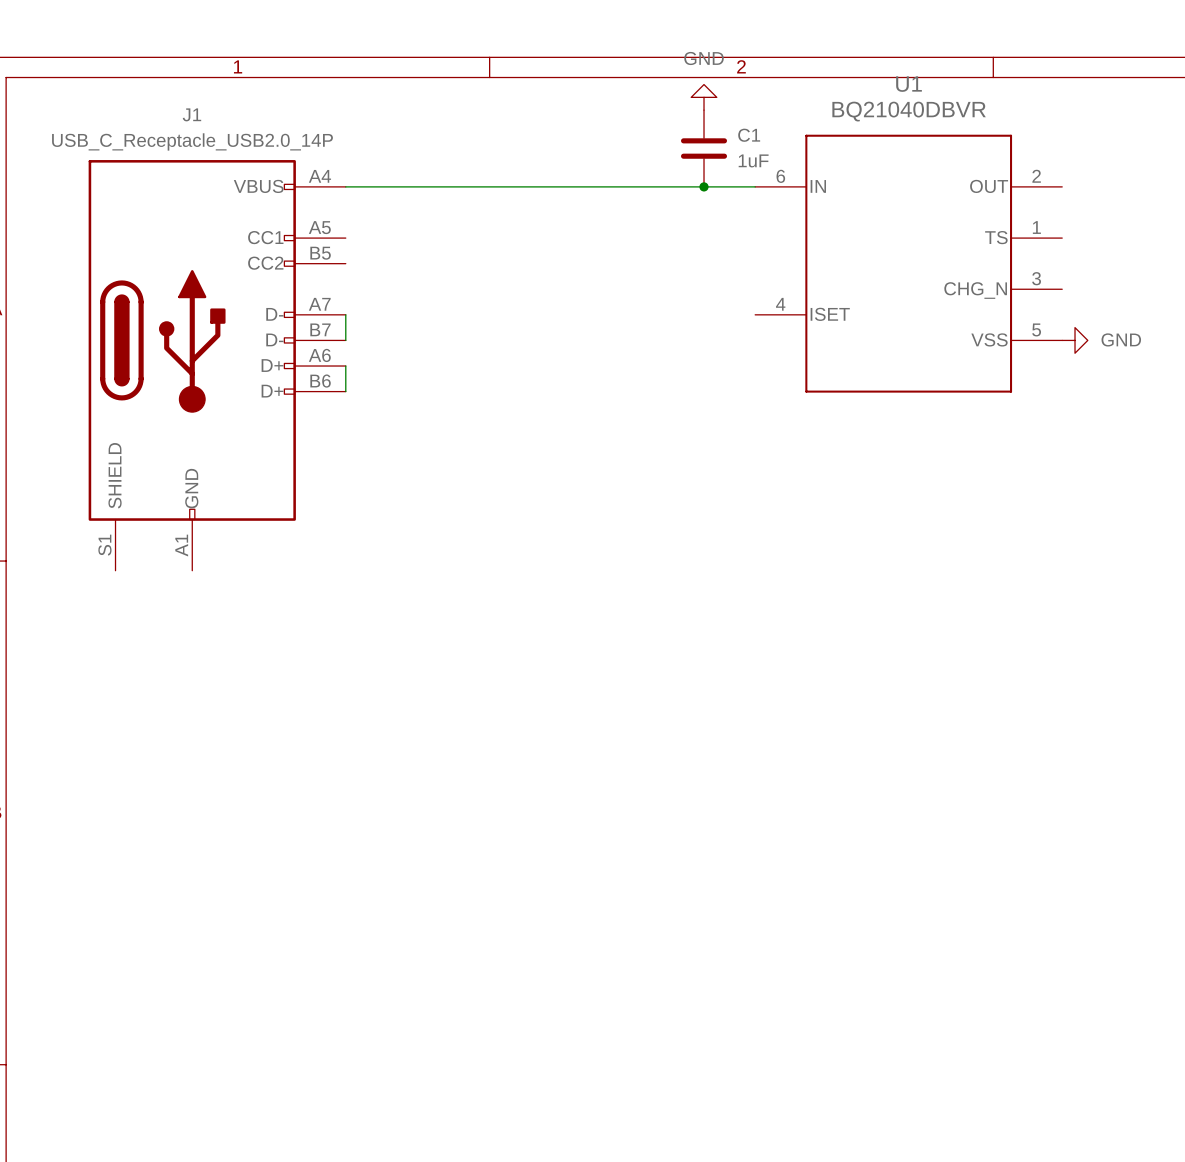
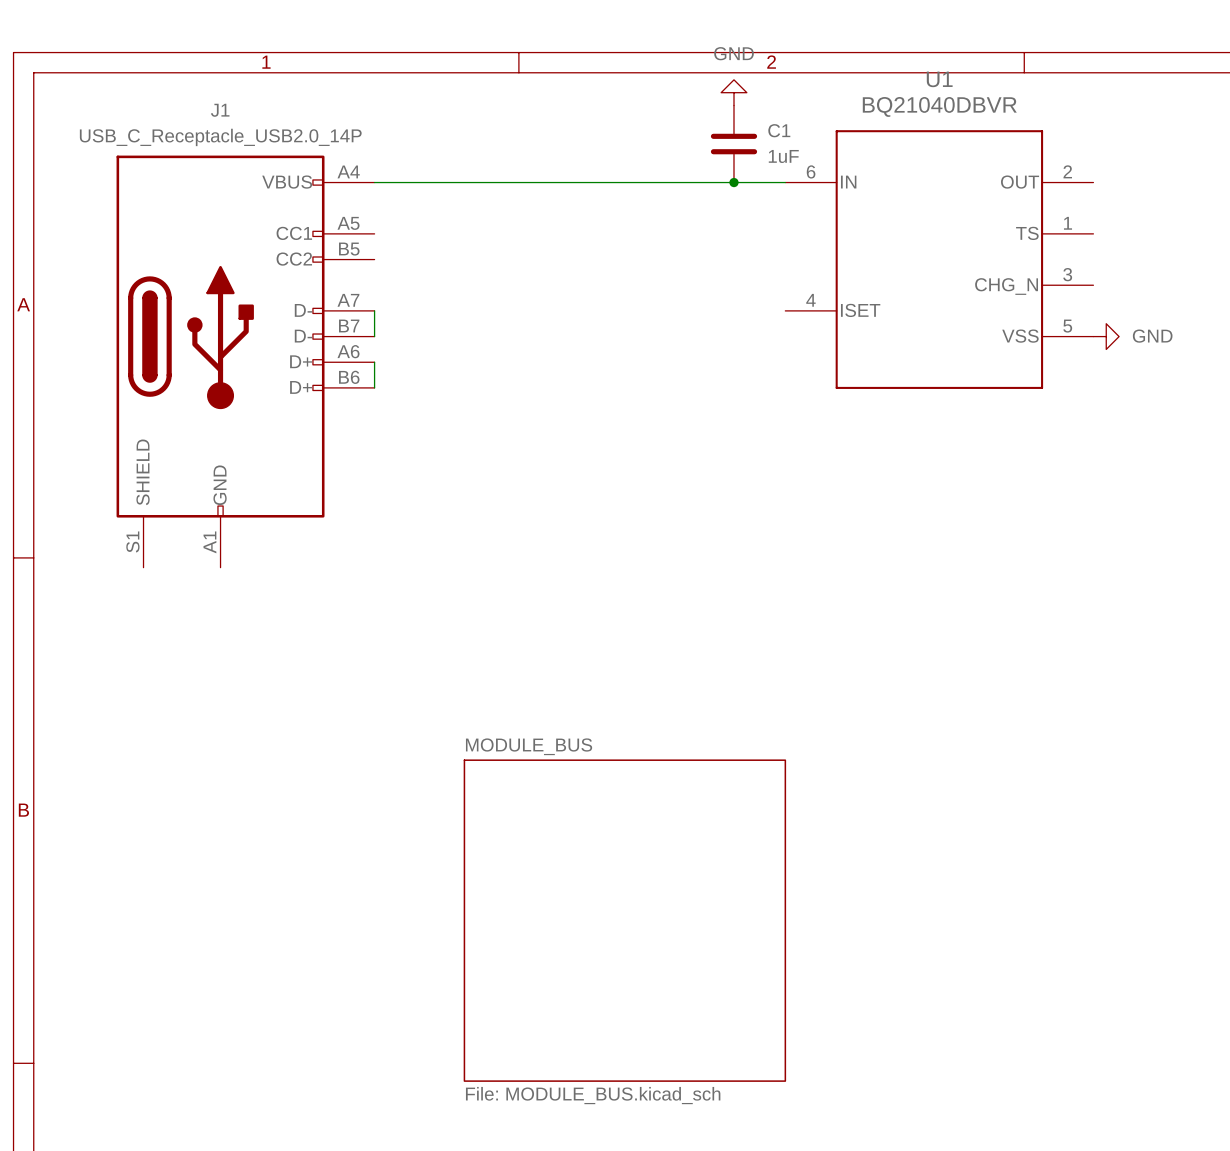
sheet MODULE_BUS: none -> File: MODULE_BUS.kicad_sch (624, 920)

